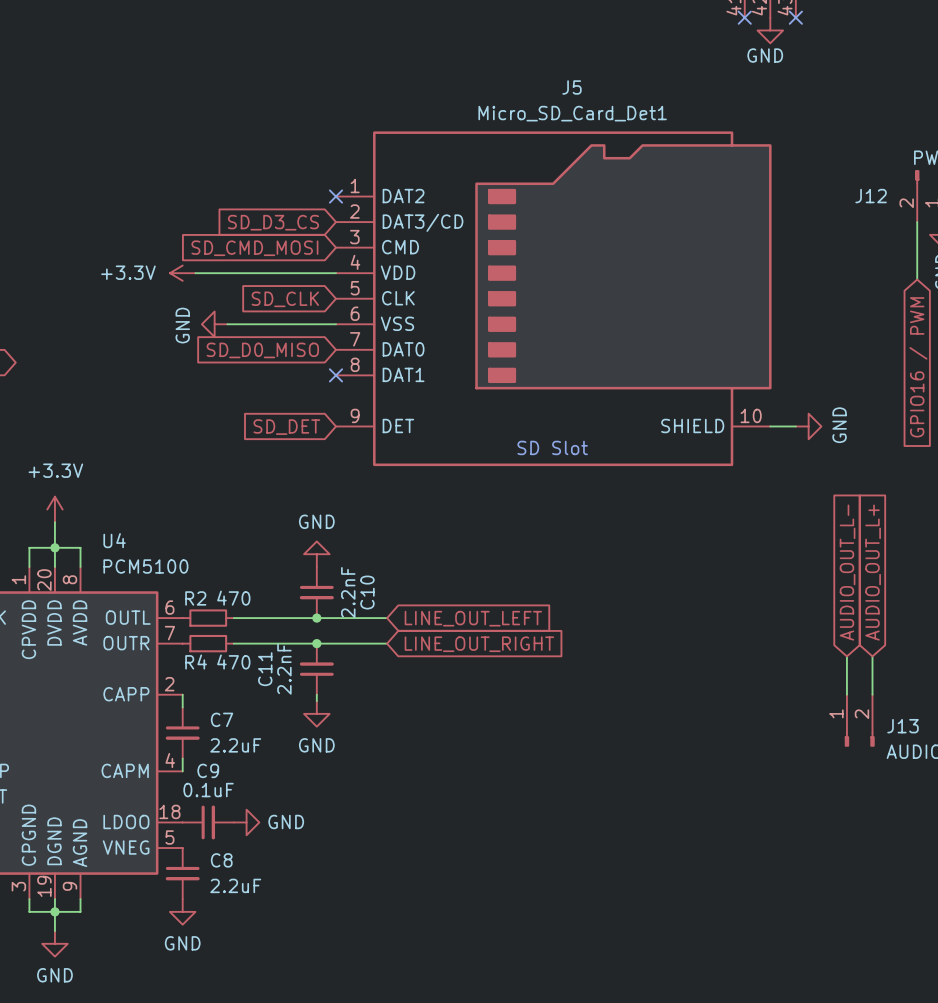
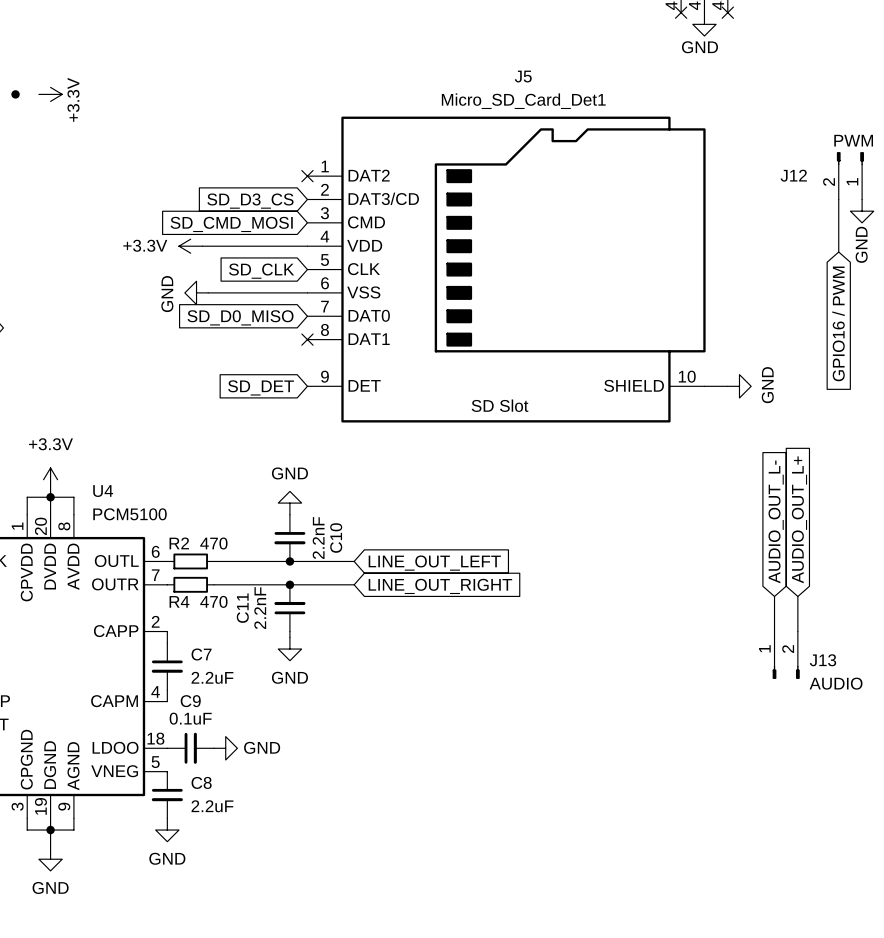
junction: none -> (15, 94)
power symbol: none -> +3.3V (50, 94)
power symbol position: +3.3V (182, 273) -> +3.3V (190, 246)
power symbol position: +3.3V (54, 509) -> +3.3V (50, 479)

